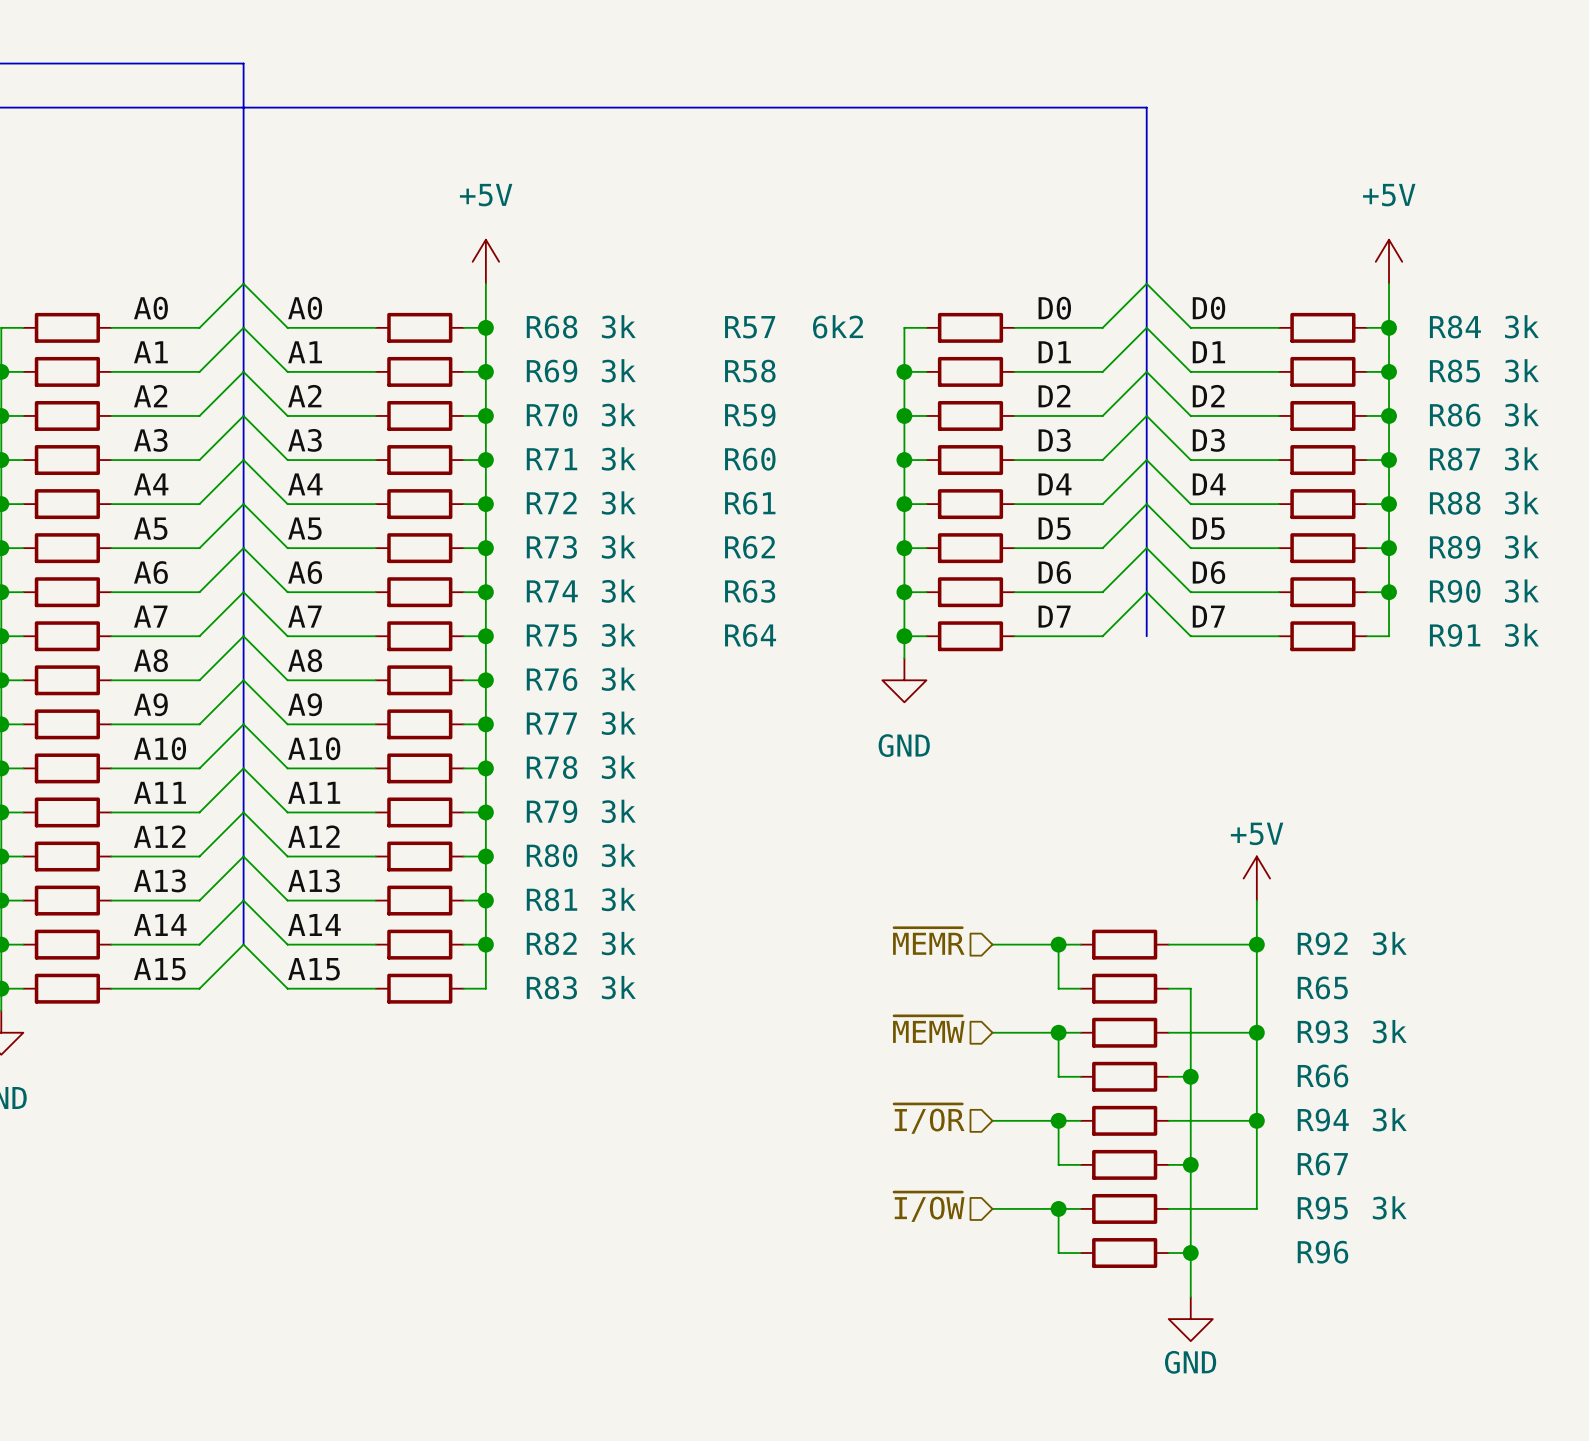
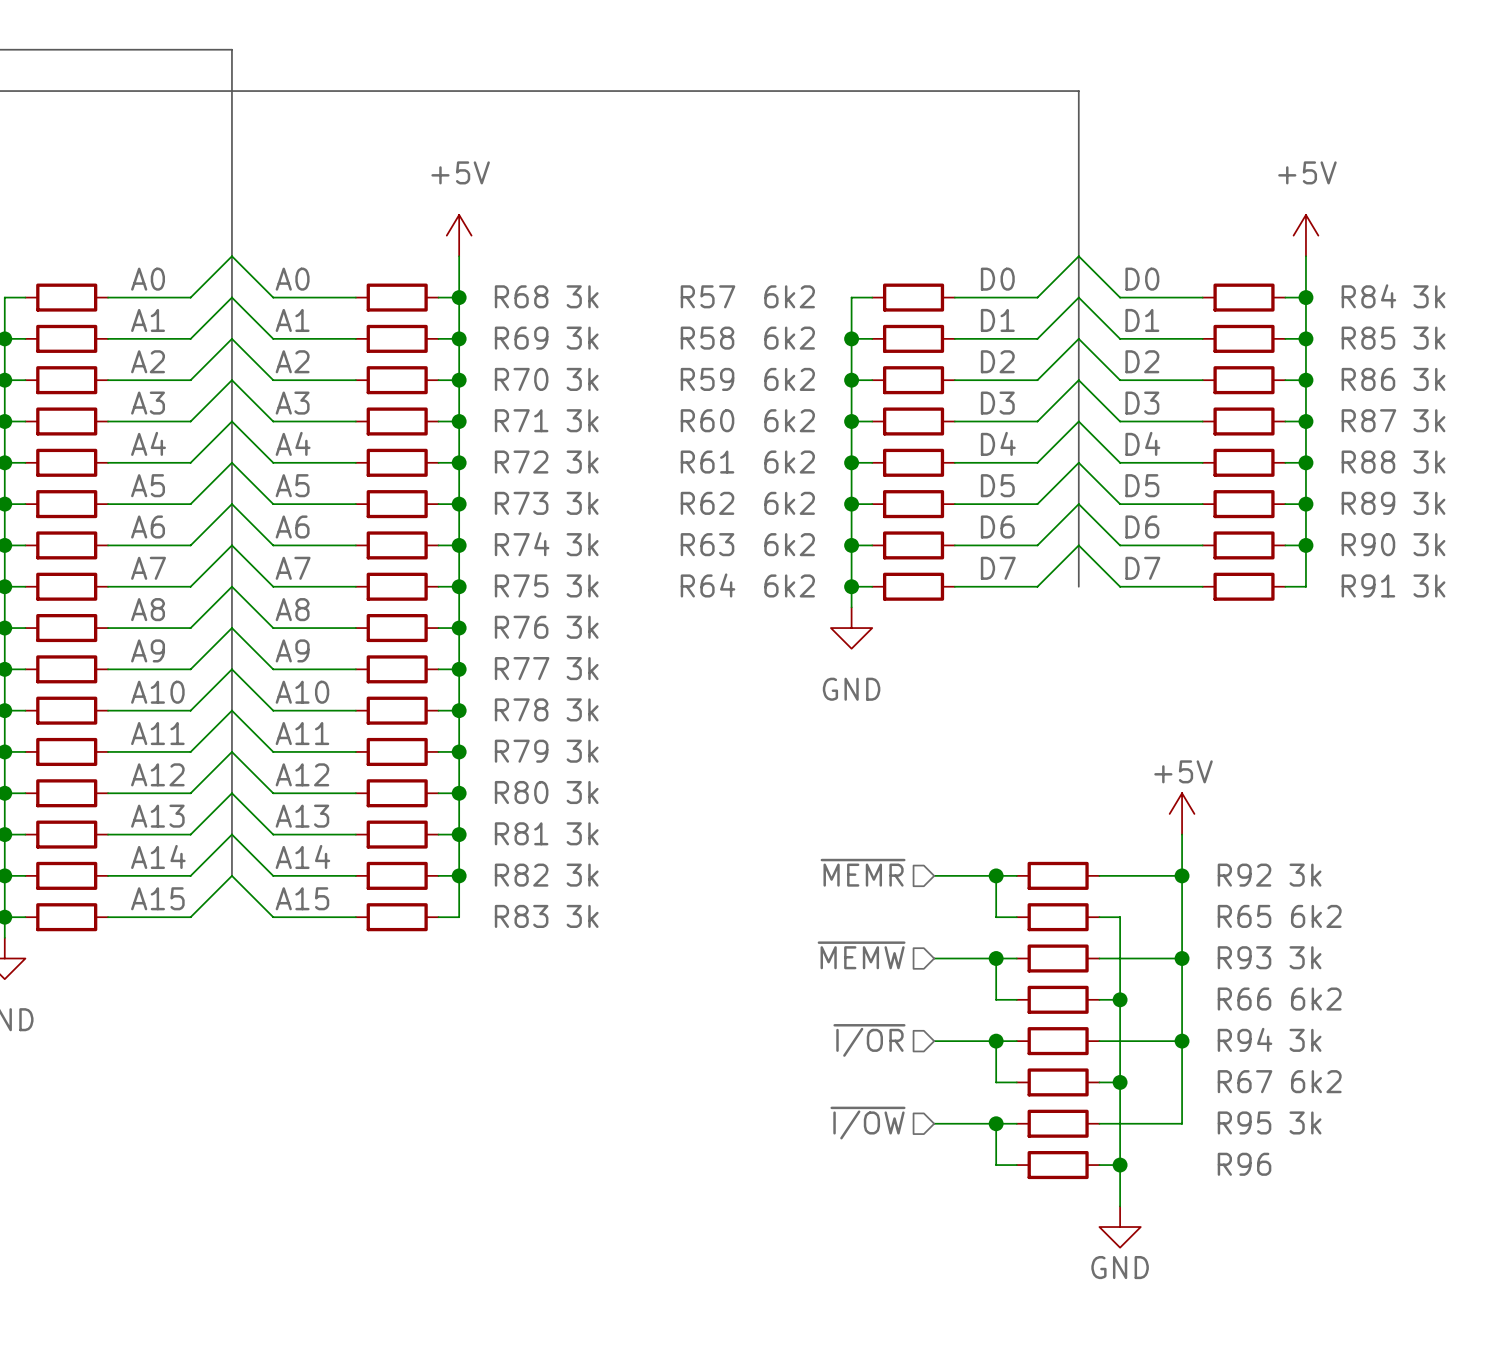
R58 value: none -> 6k2 (789, 338)
R59 value: none -> 6k2 (789, 379)
R60 value: none -> 6k2 (789, 420)
R61 value: none -> 6k2 (789, 462)
R62 value: none -> 6k2 (789, 503)
R63 value: none -> 6k2 (789, 544)
R64 value: none -> 6k2 (789, 585)
R65 value: none -> 6k2 (1316, 916)
R66 value: none -> 6k2 (1316, 999)
R67 value: none -> 6k2 (1316, 1081)

